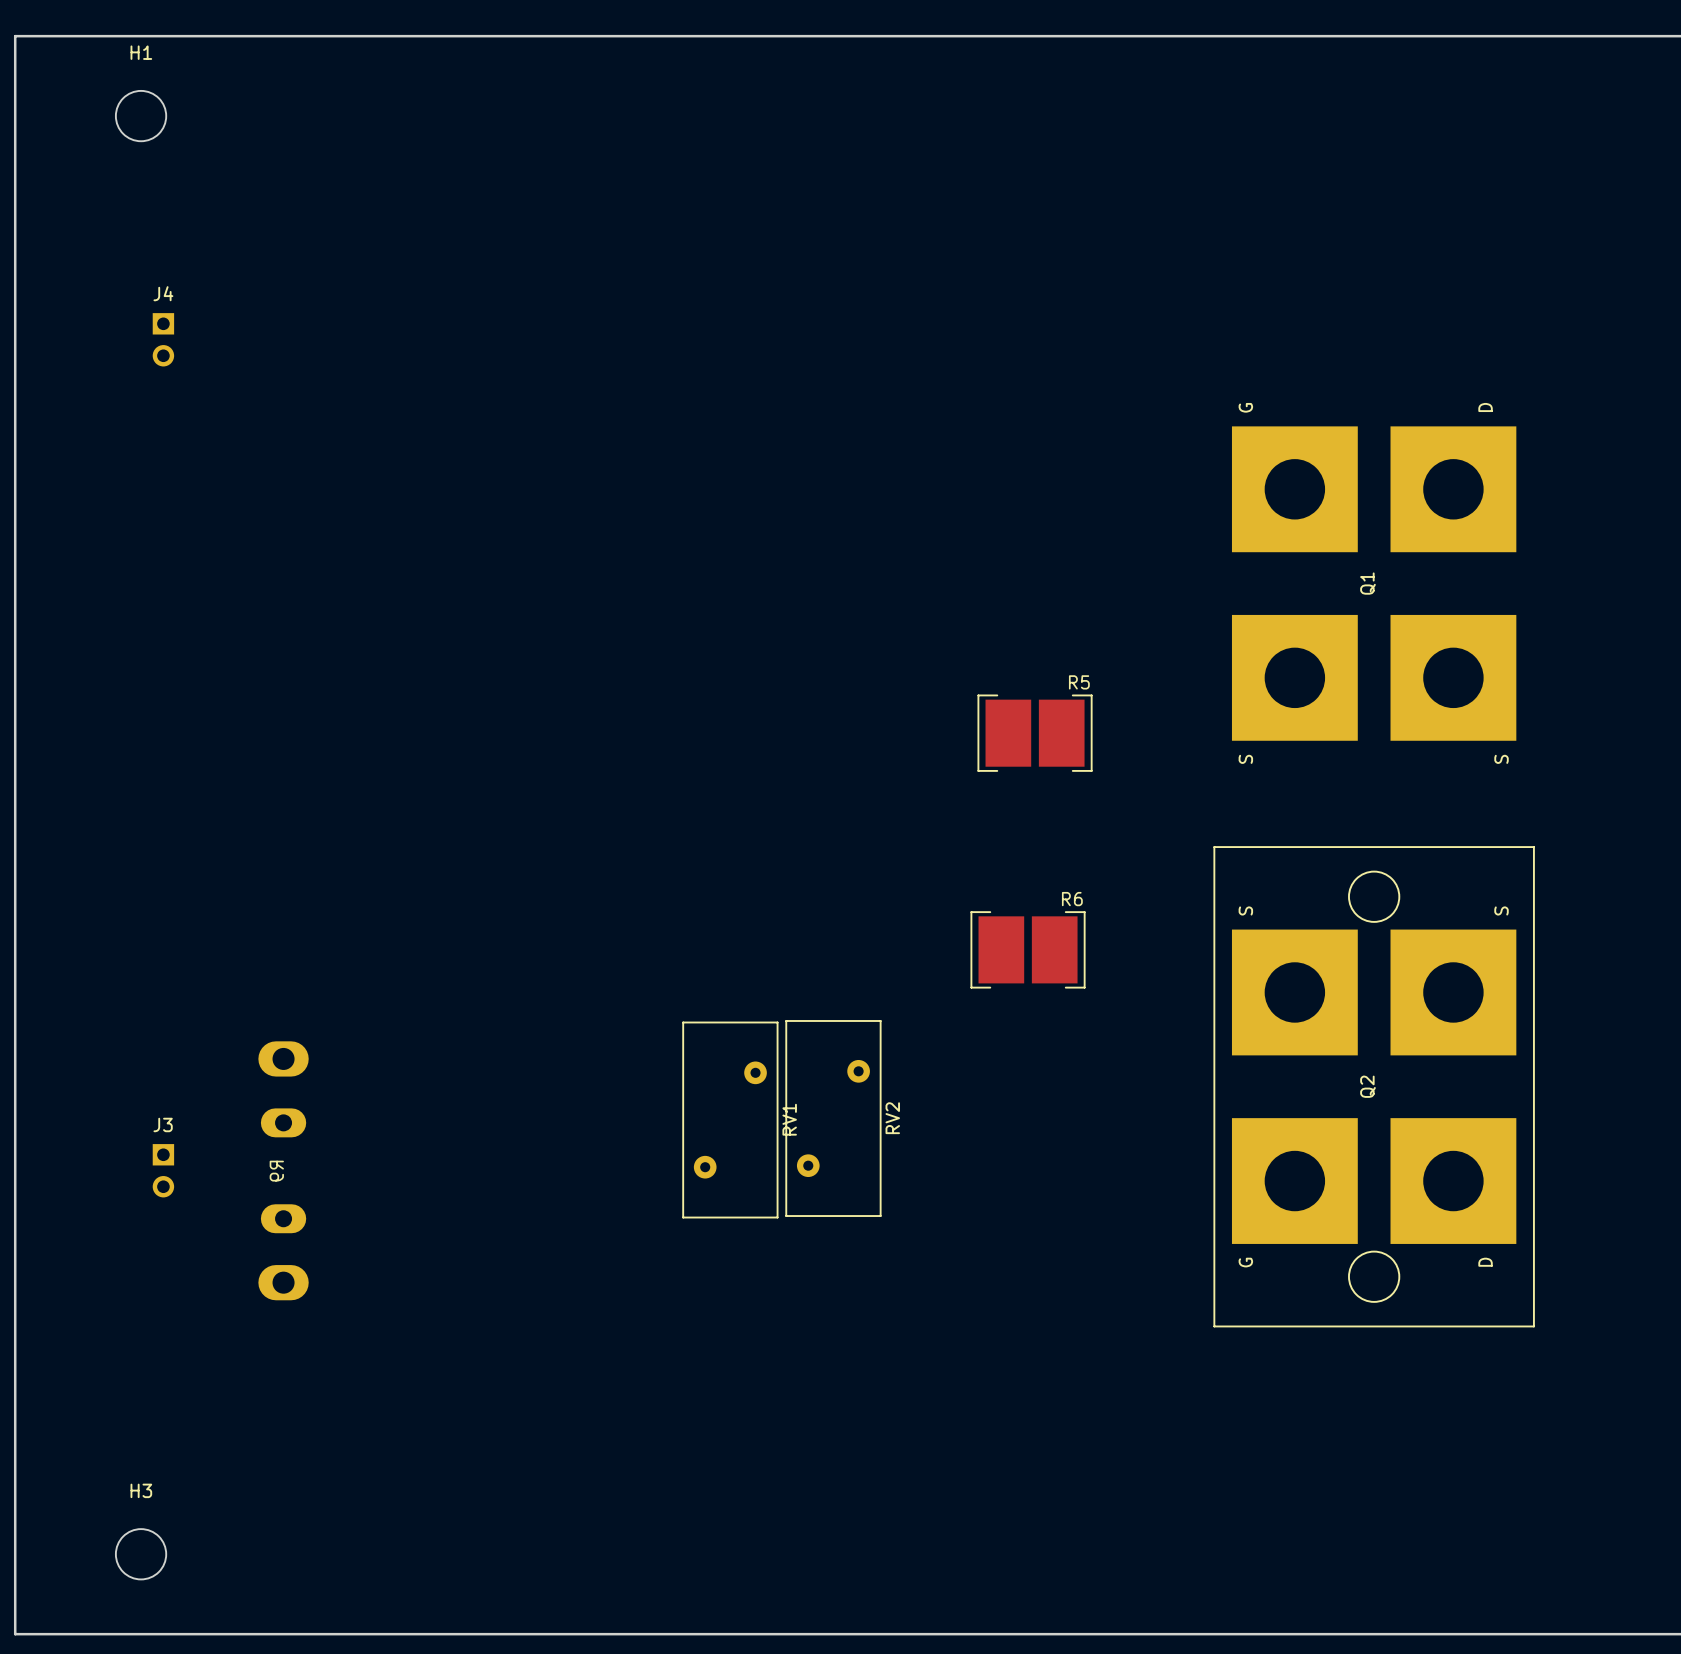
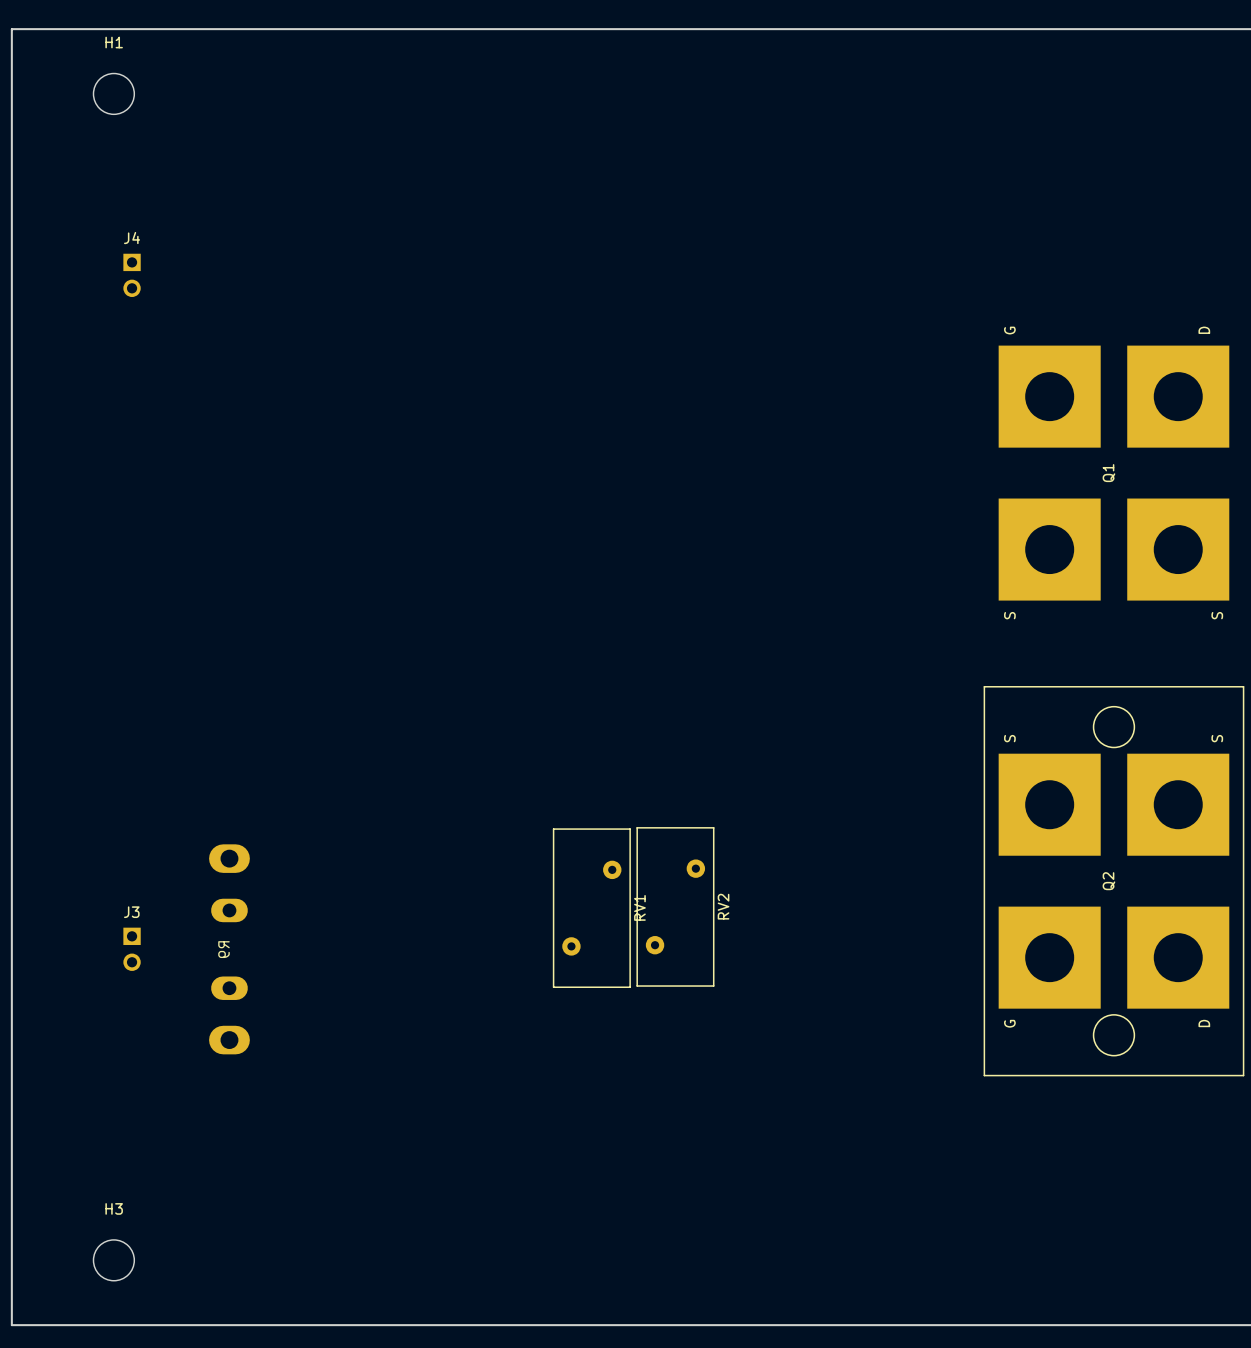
R5: (1035, 733) -> none
R6: (1028, 949) -> none

